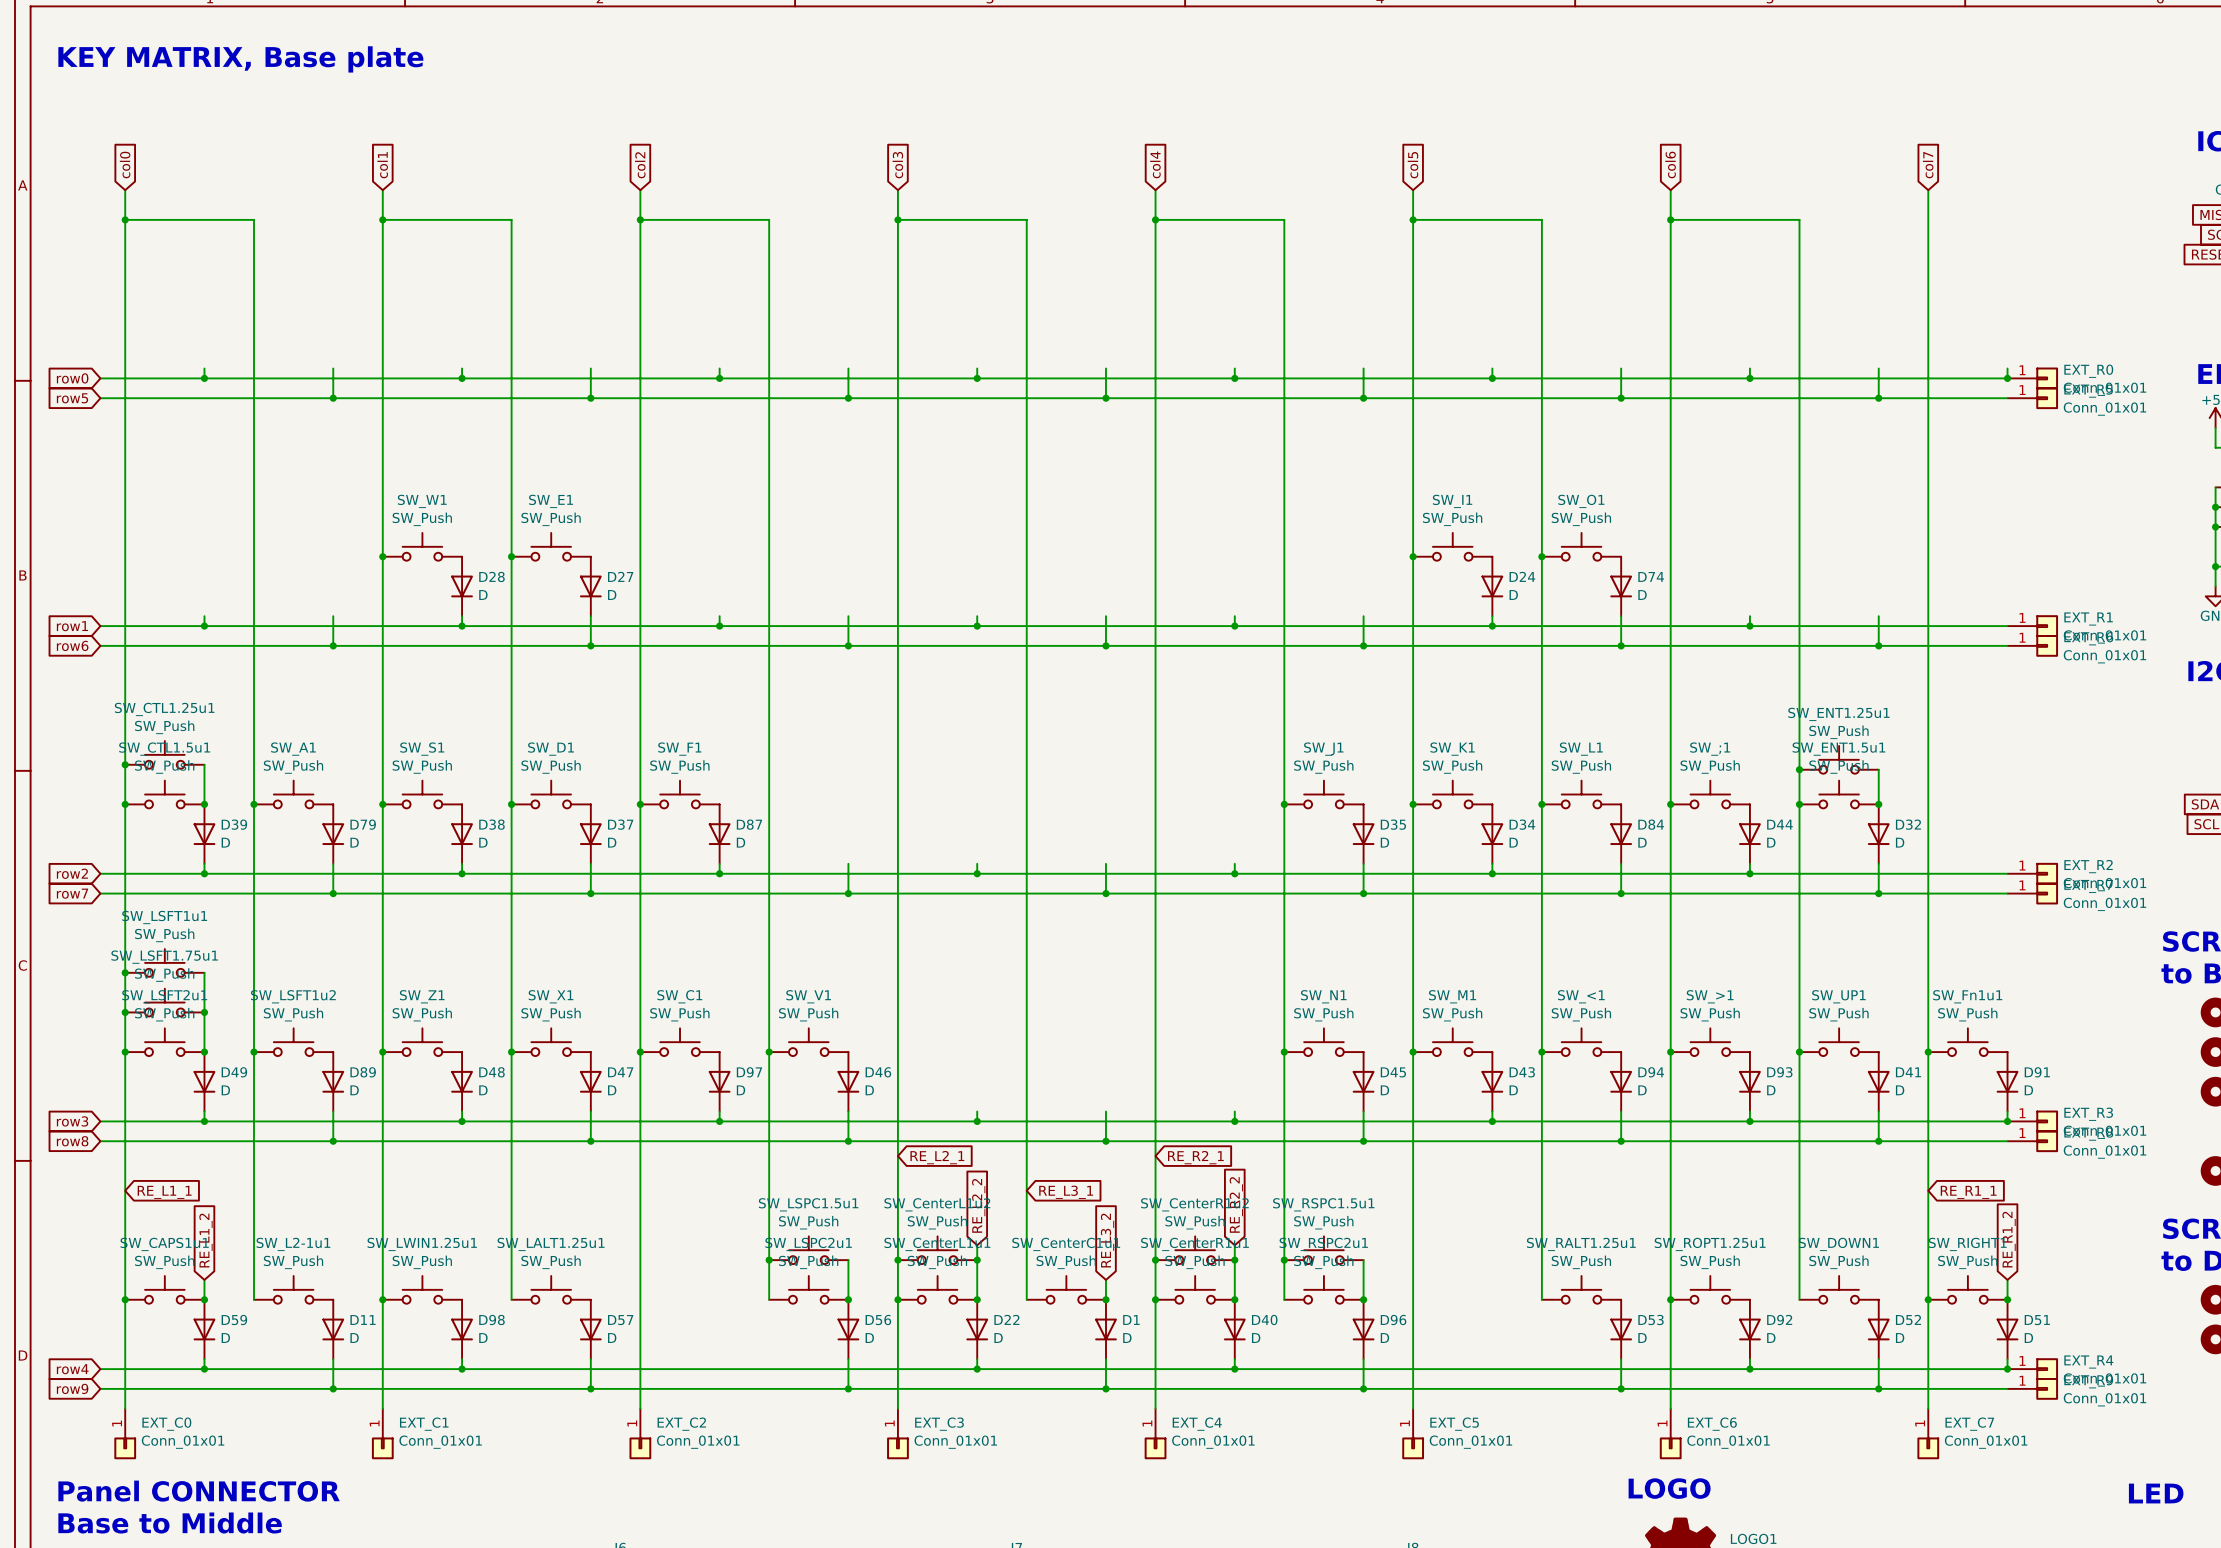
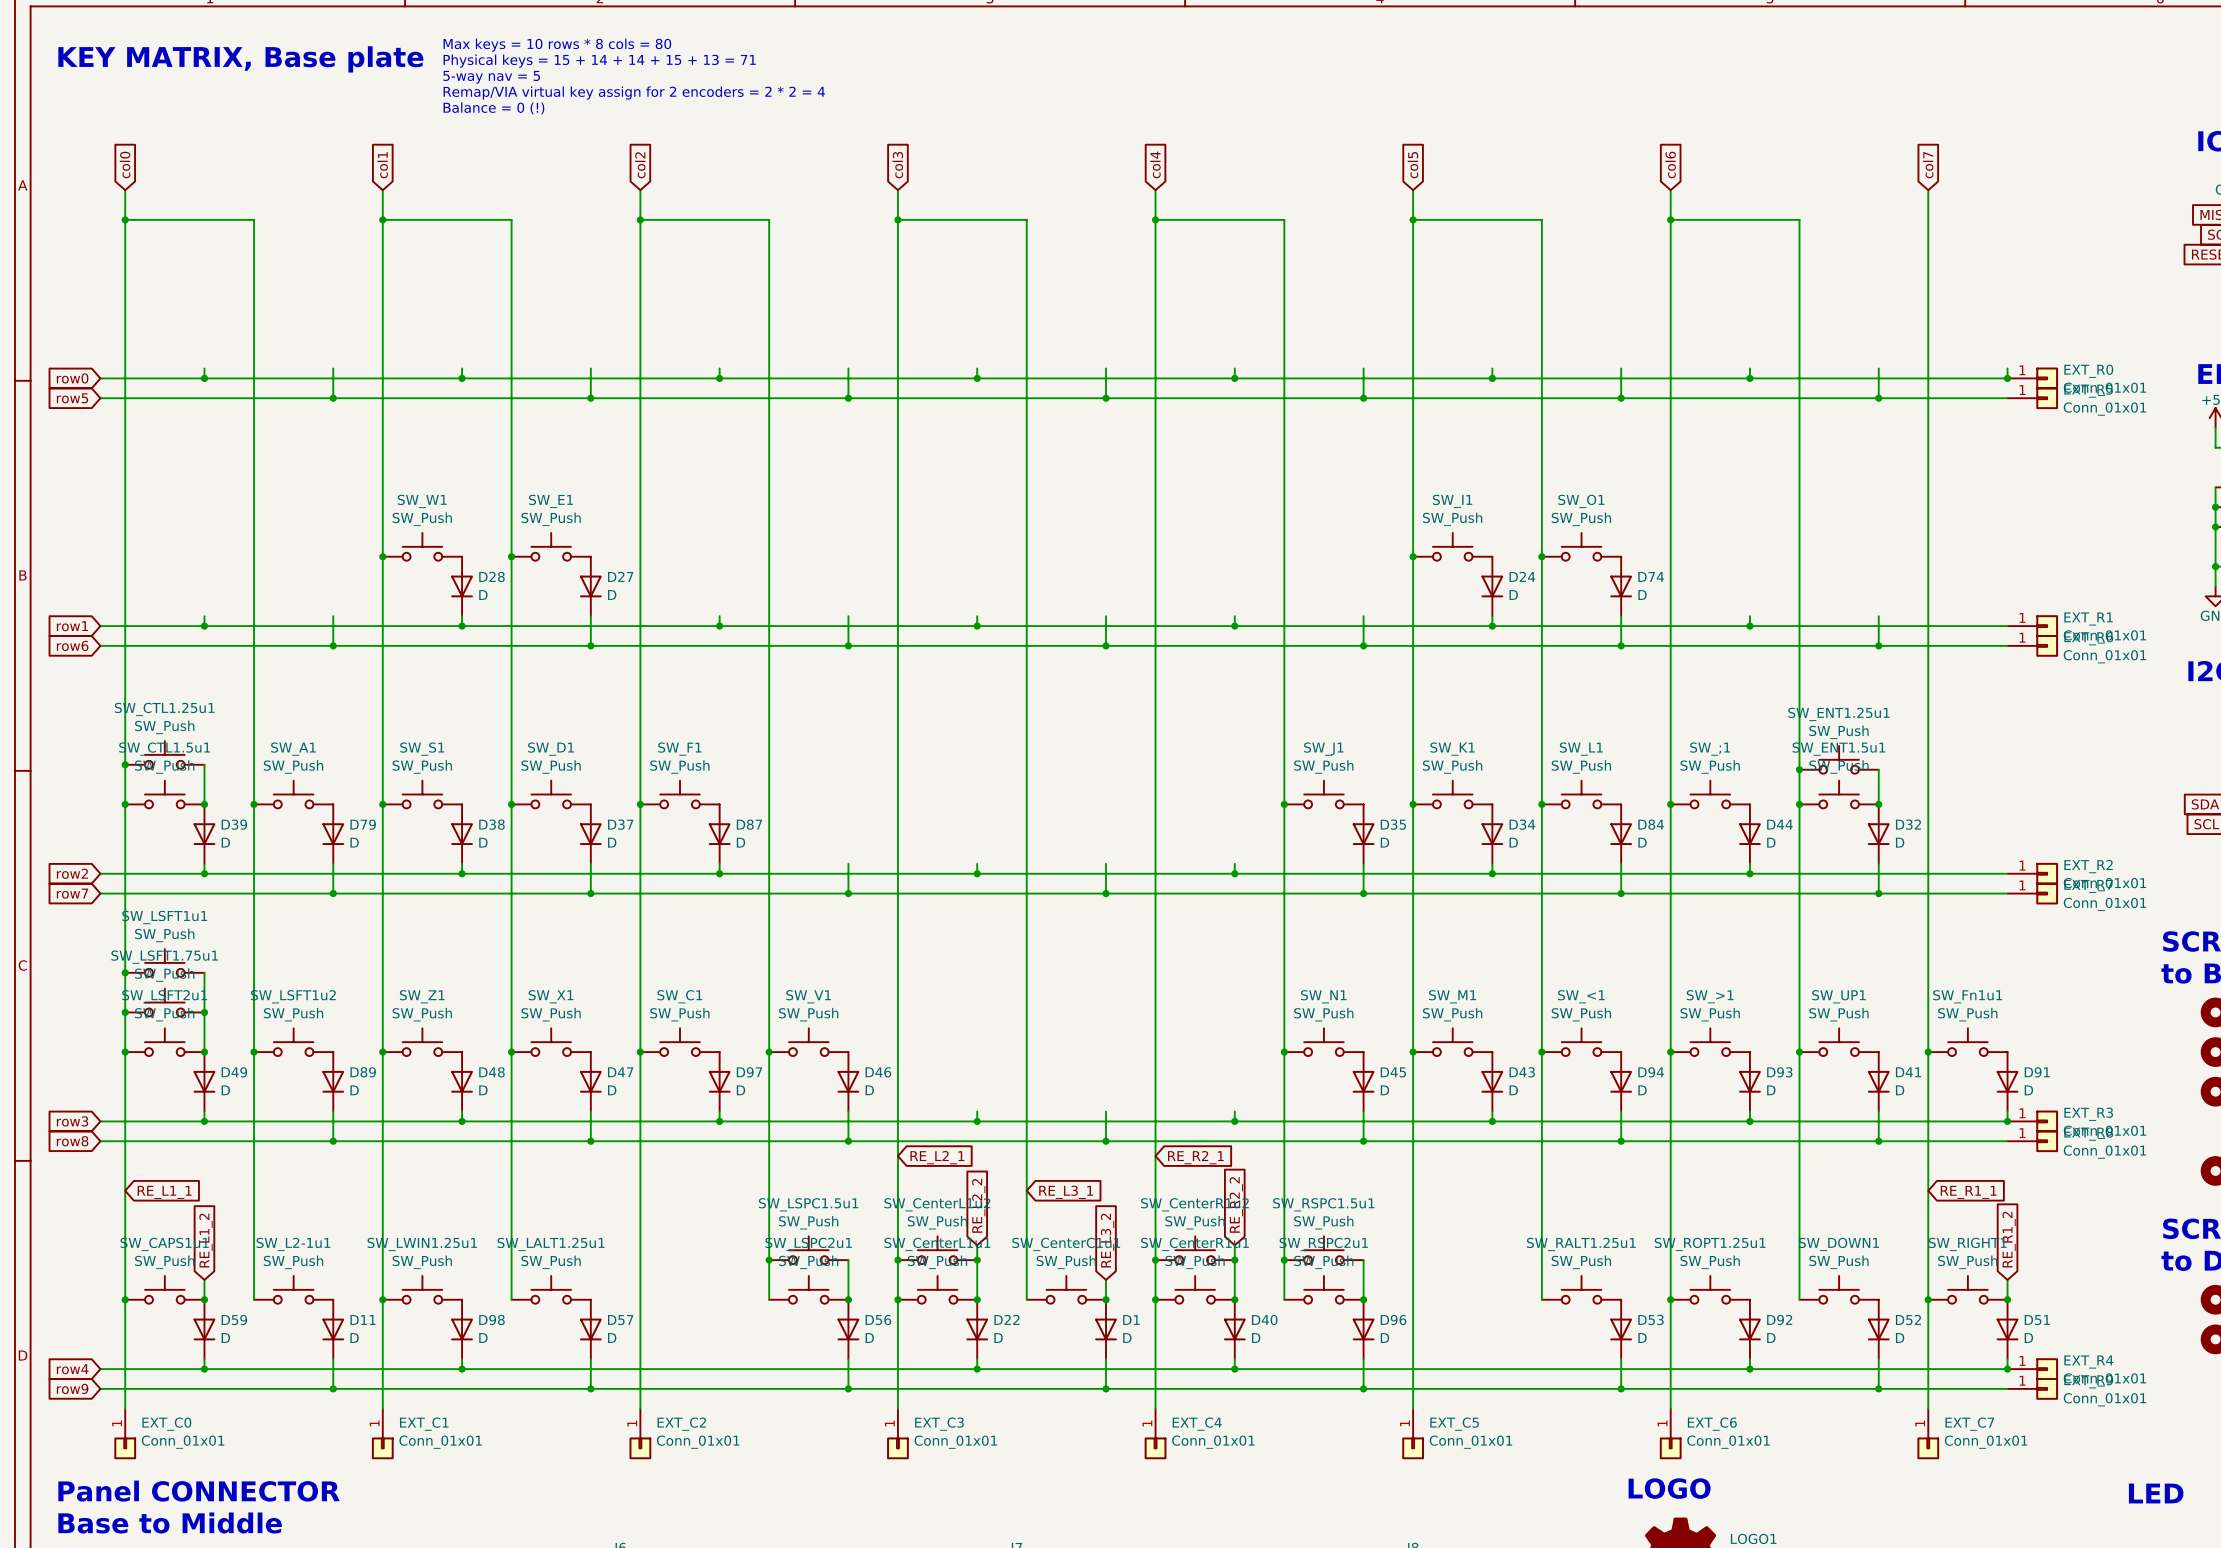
text: none -> Max keys = 10 rows * 8 cols = 80 (557, 45)
text: none -> Physical keys = 15 + 14 + 14 + 15 + 13 = 71 (599, 61)
text: none -> 5-way nav = 5 (491, 77)
text: none -> Remap/VIA virtual key assign for 2 encoders = 2 * 2 = 4 (634, 93)
text: none -> Balance = 0 (!) (493, 108)

